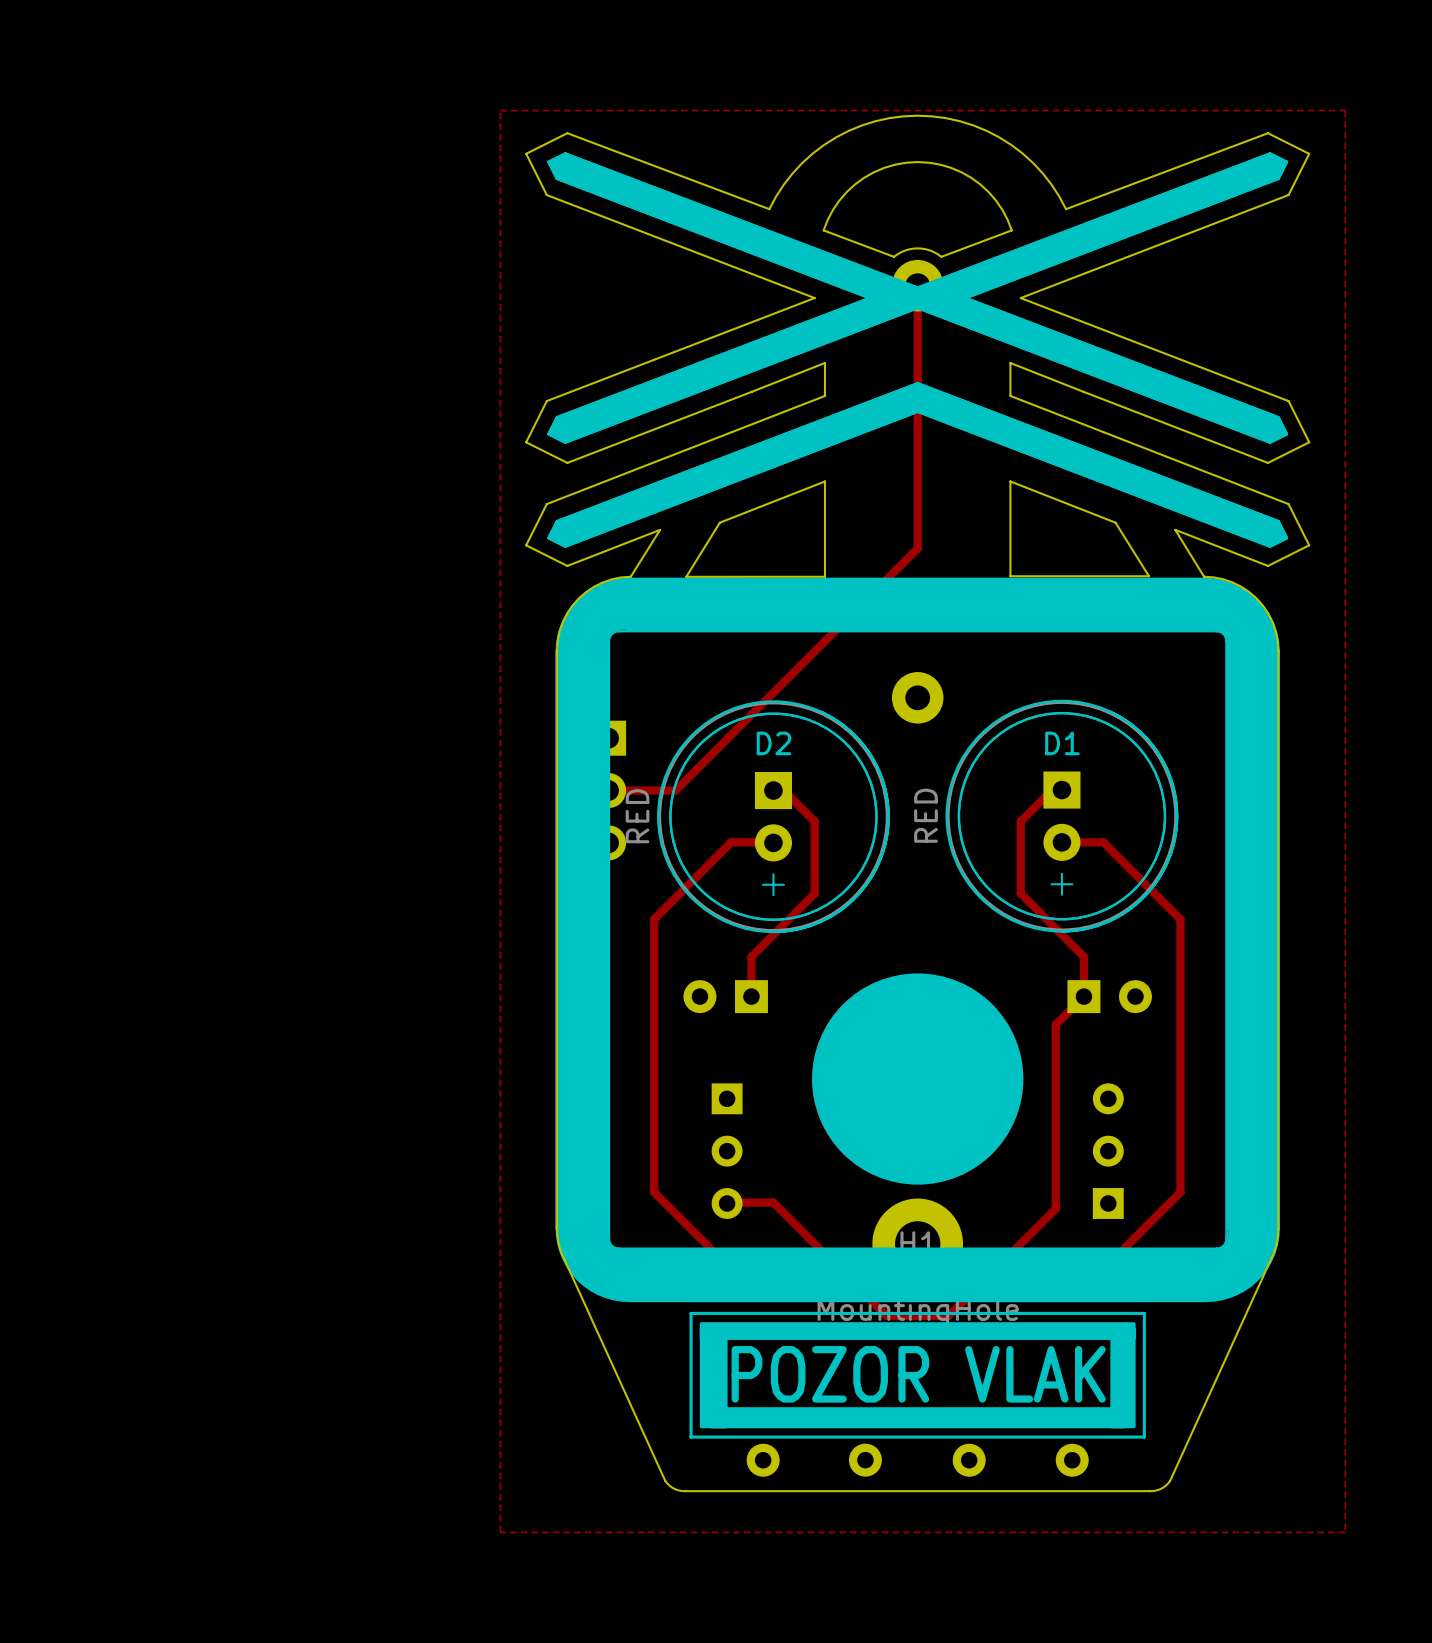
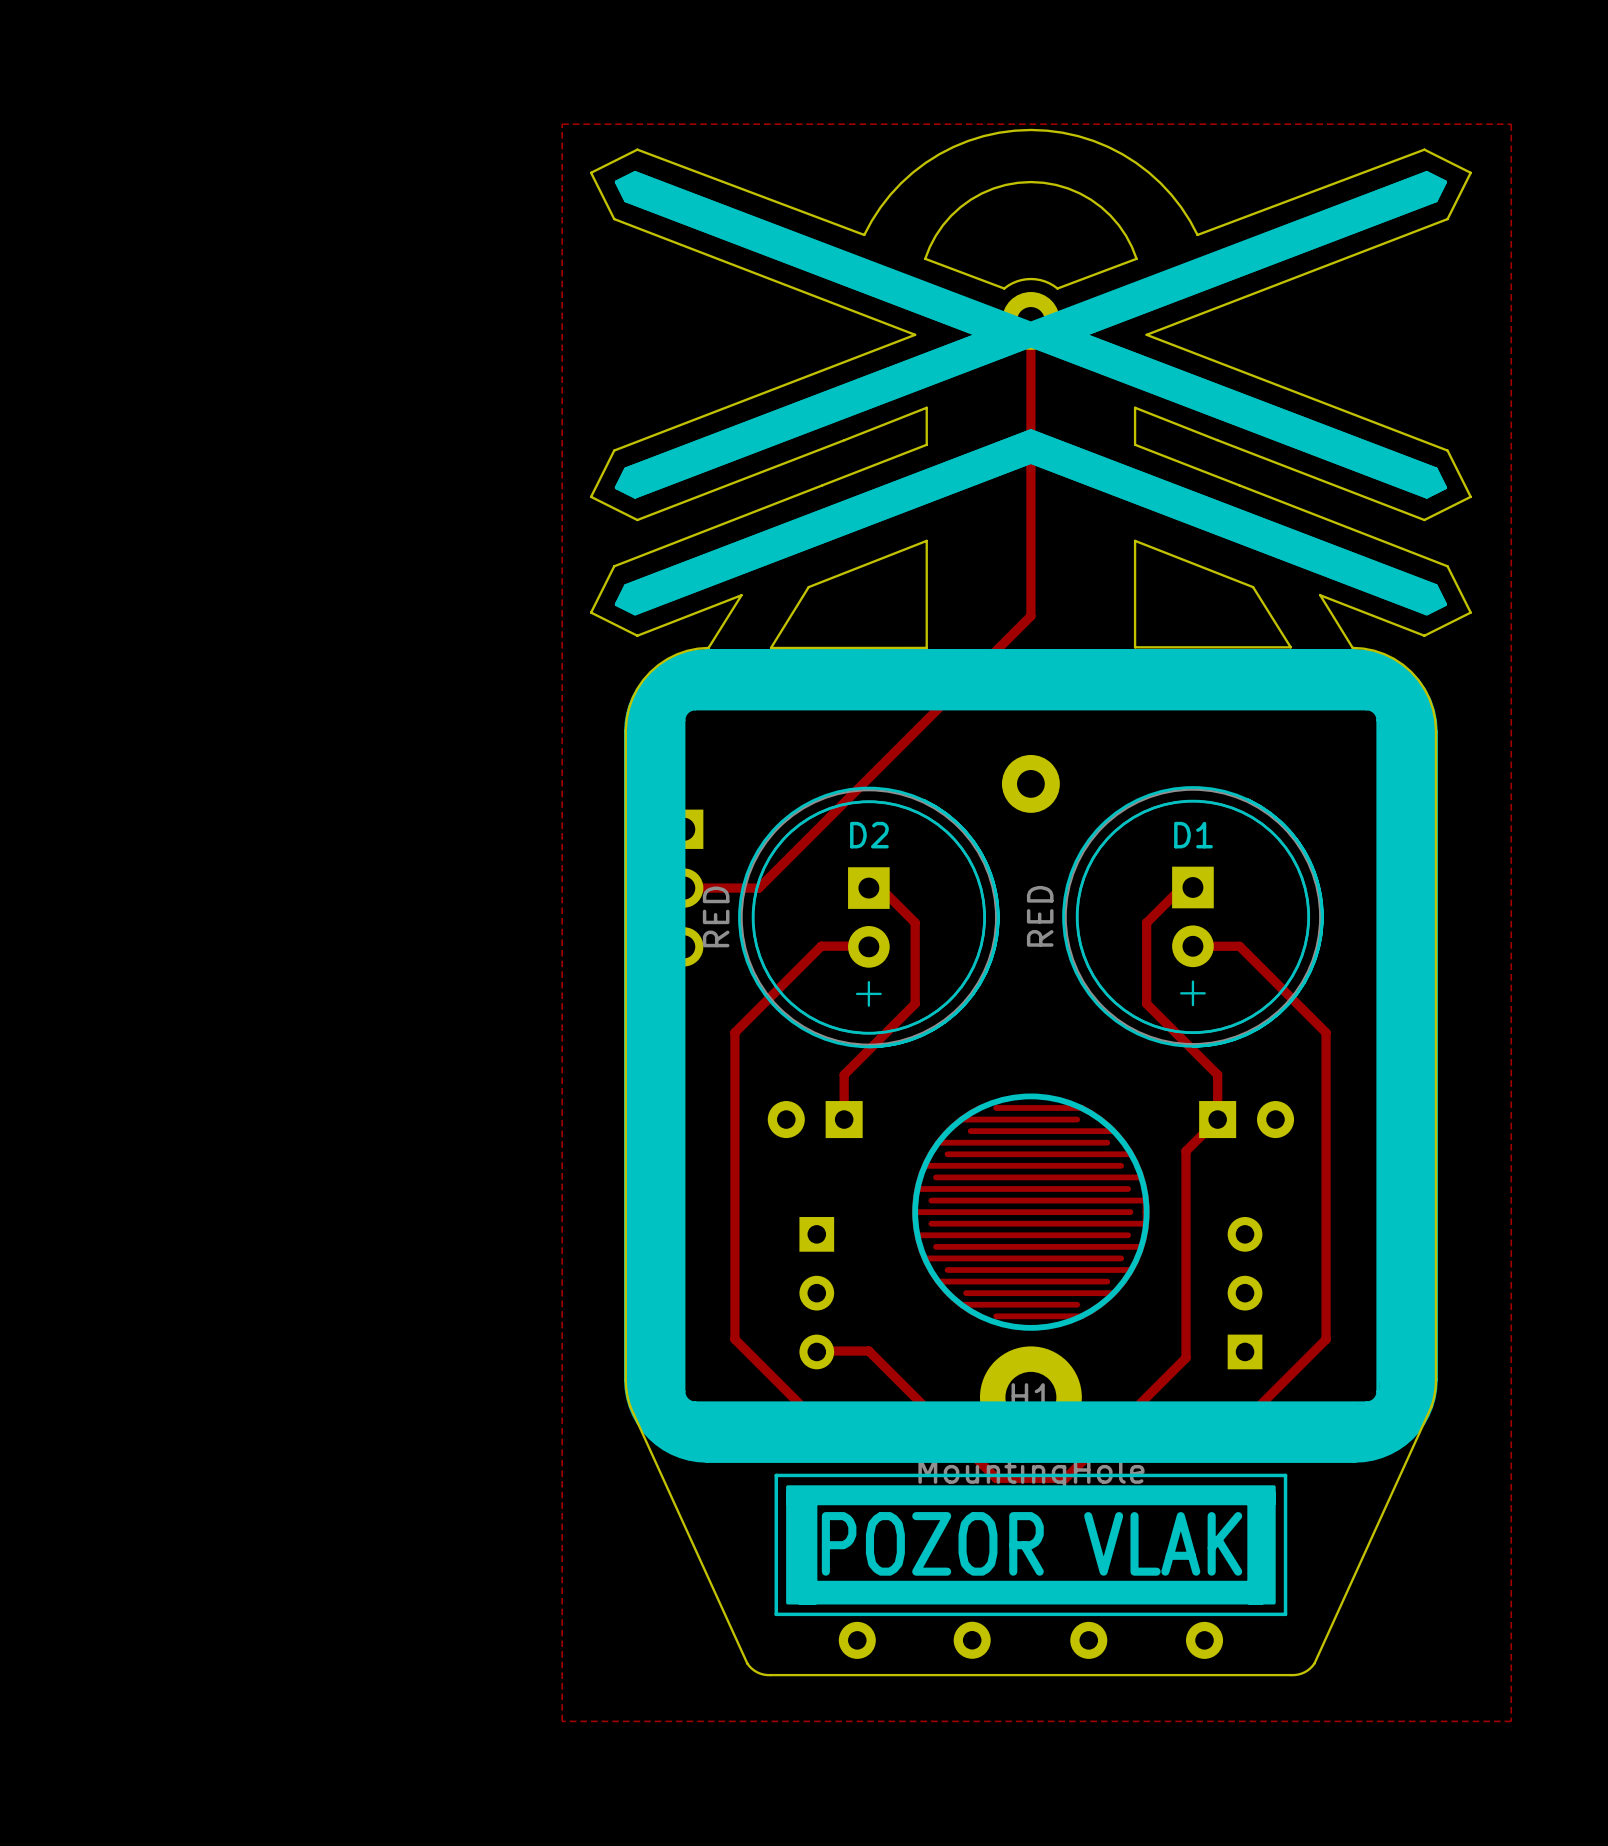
drawing: [813, 974, 1023, 1184] -> none

